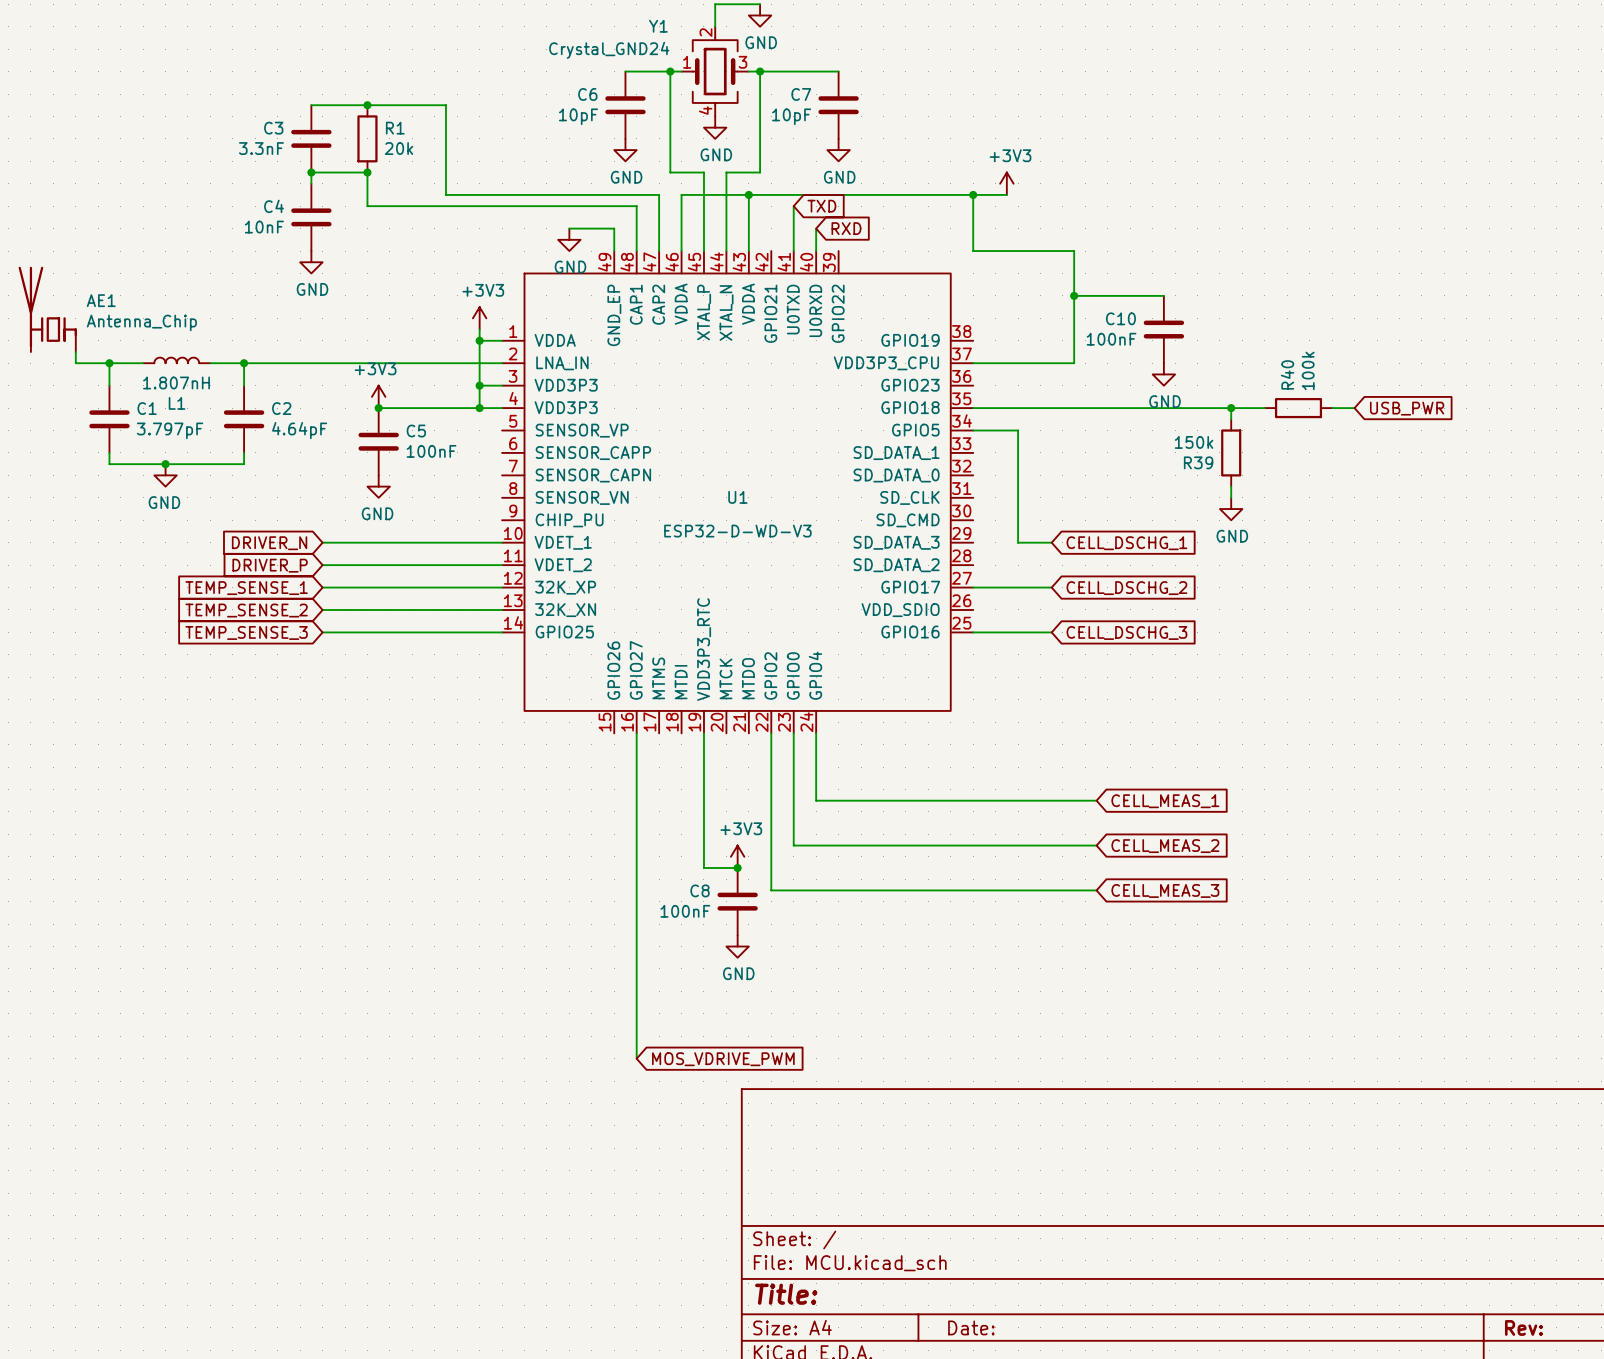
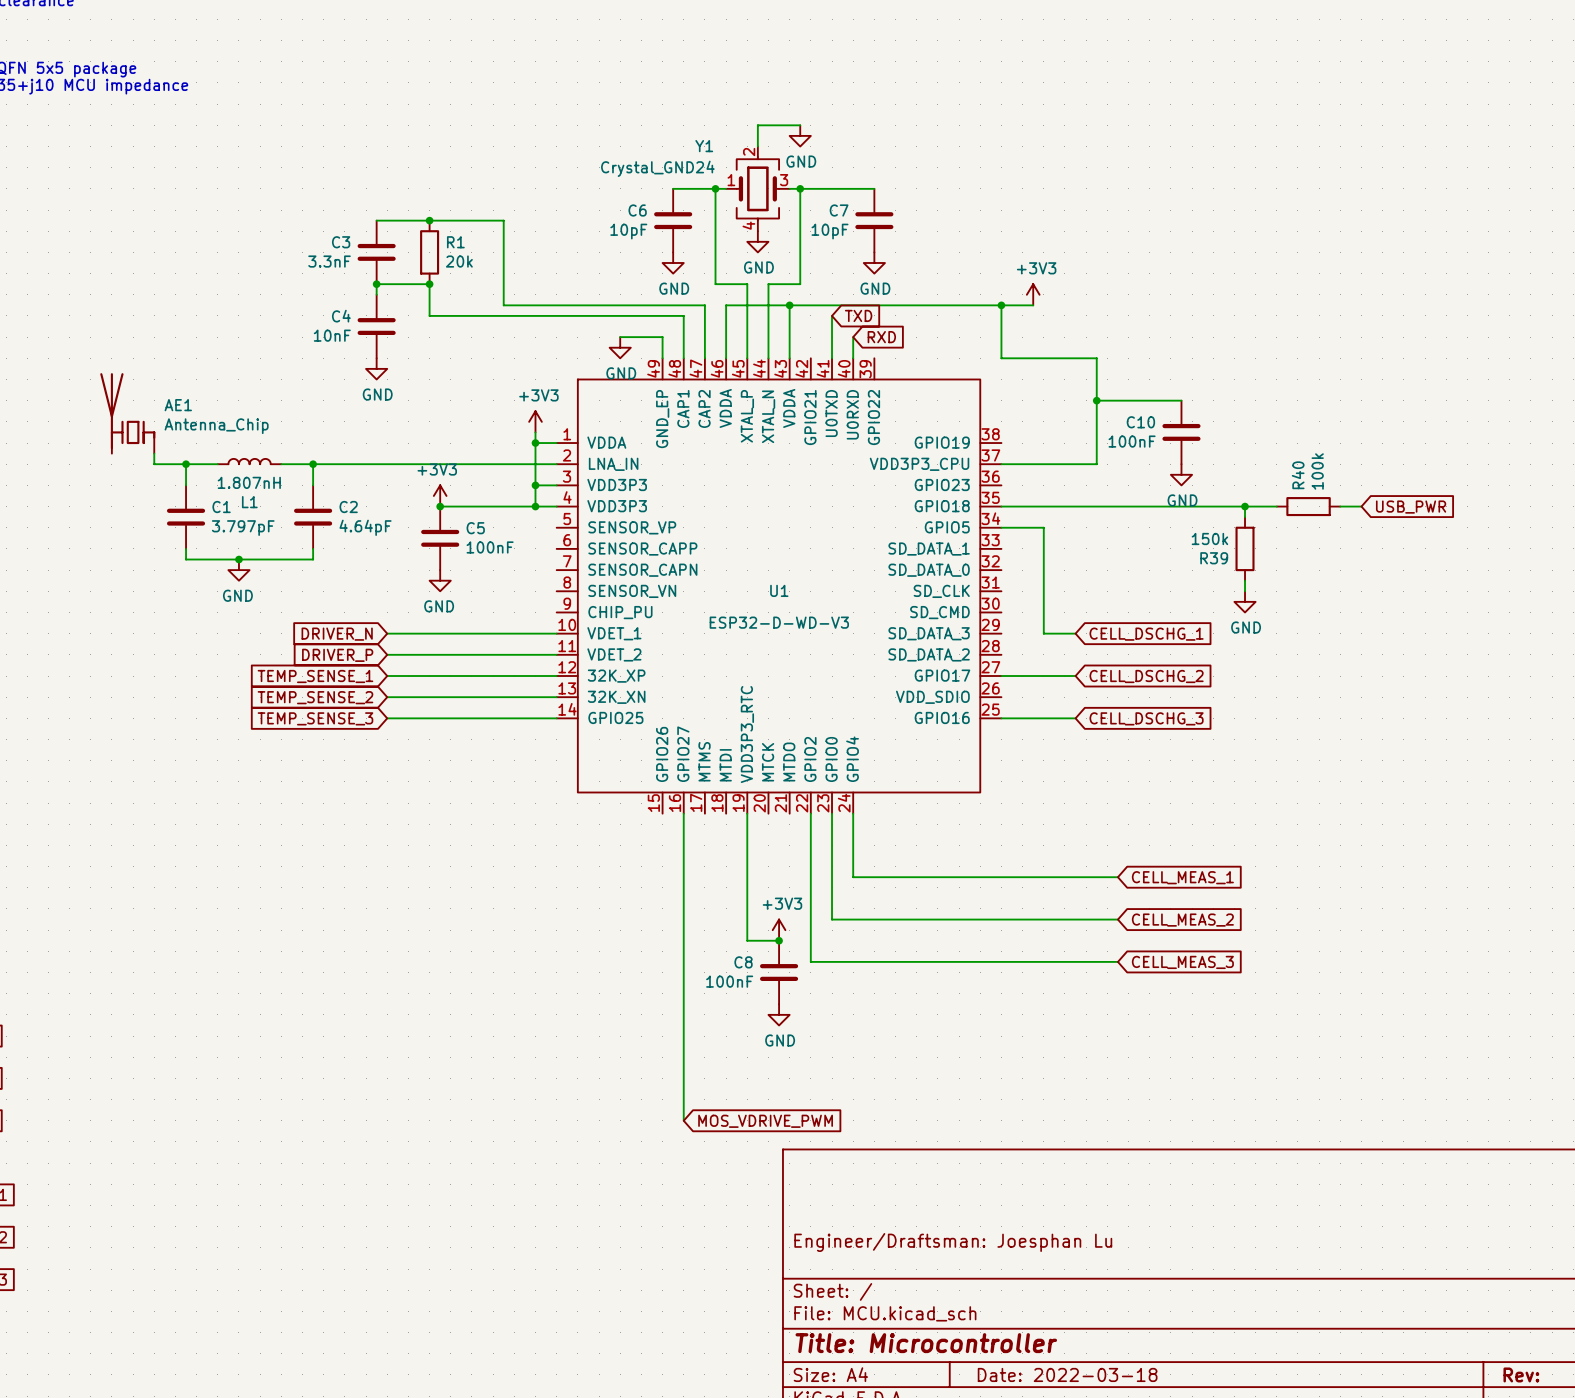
title block: none -> Engineer/Draftsman: Joesphan Lu (953, 1242)
title block: Title: (786, 1294) -> Title: Microcontroller (926, 1343)
title block: Date: (971, 1327) -> Date: 2022-03-18 (1067, 1374)

